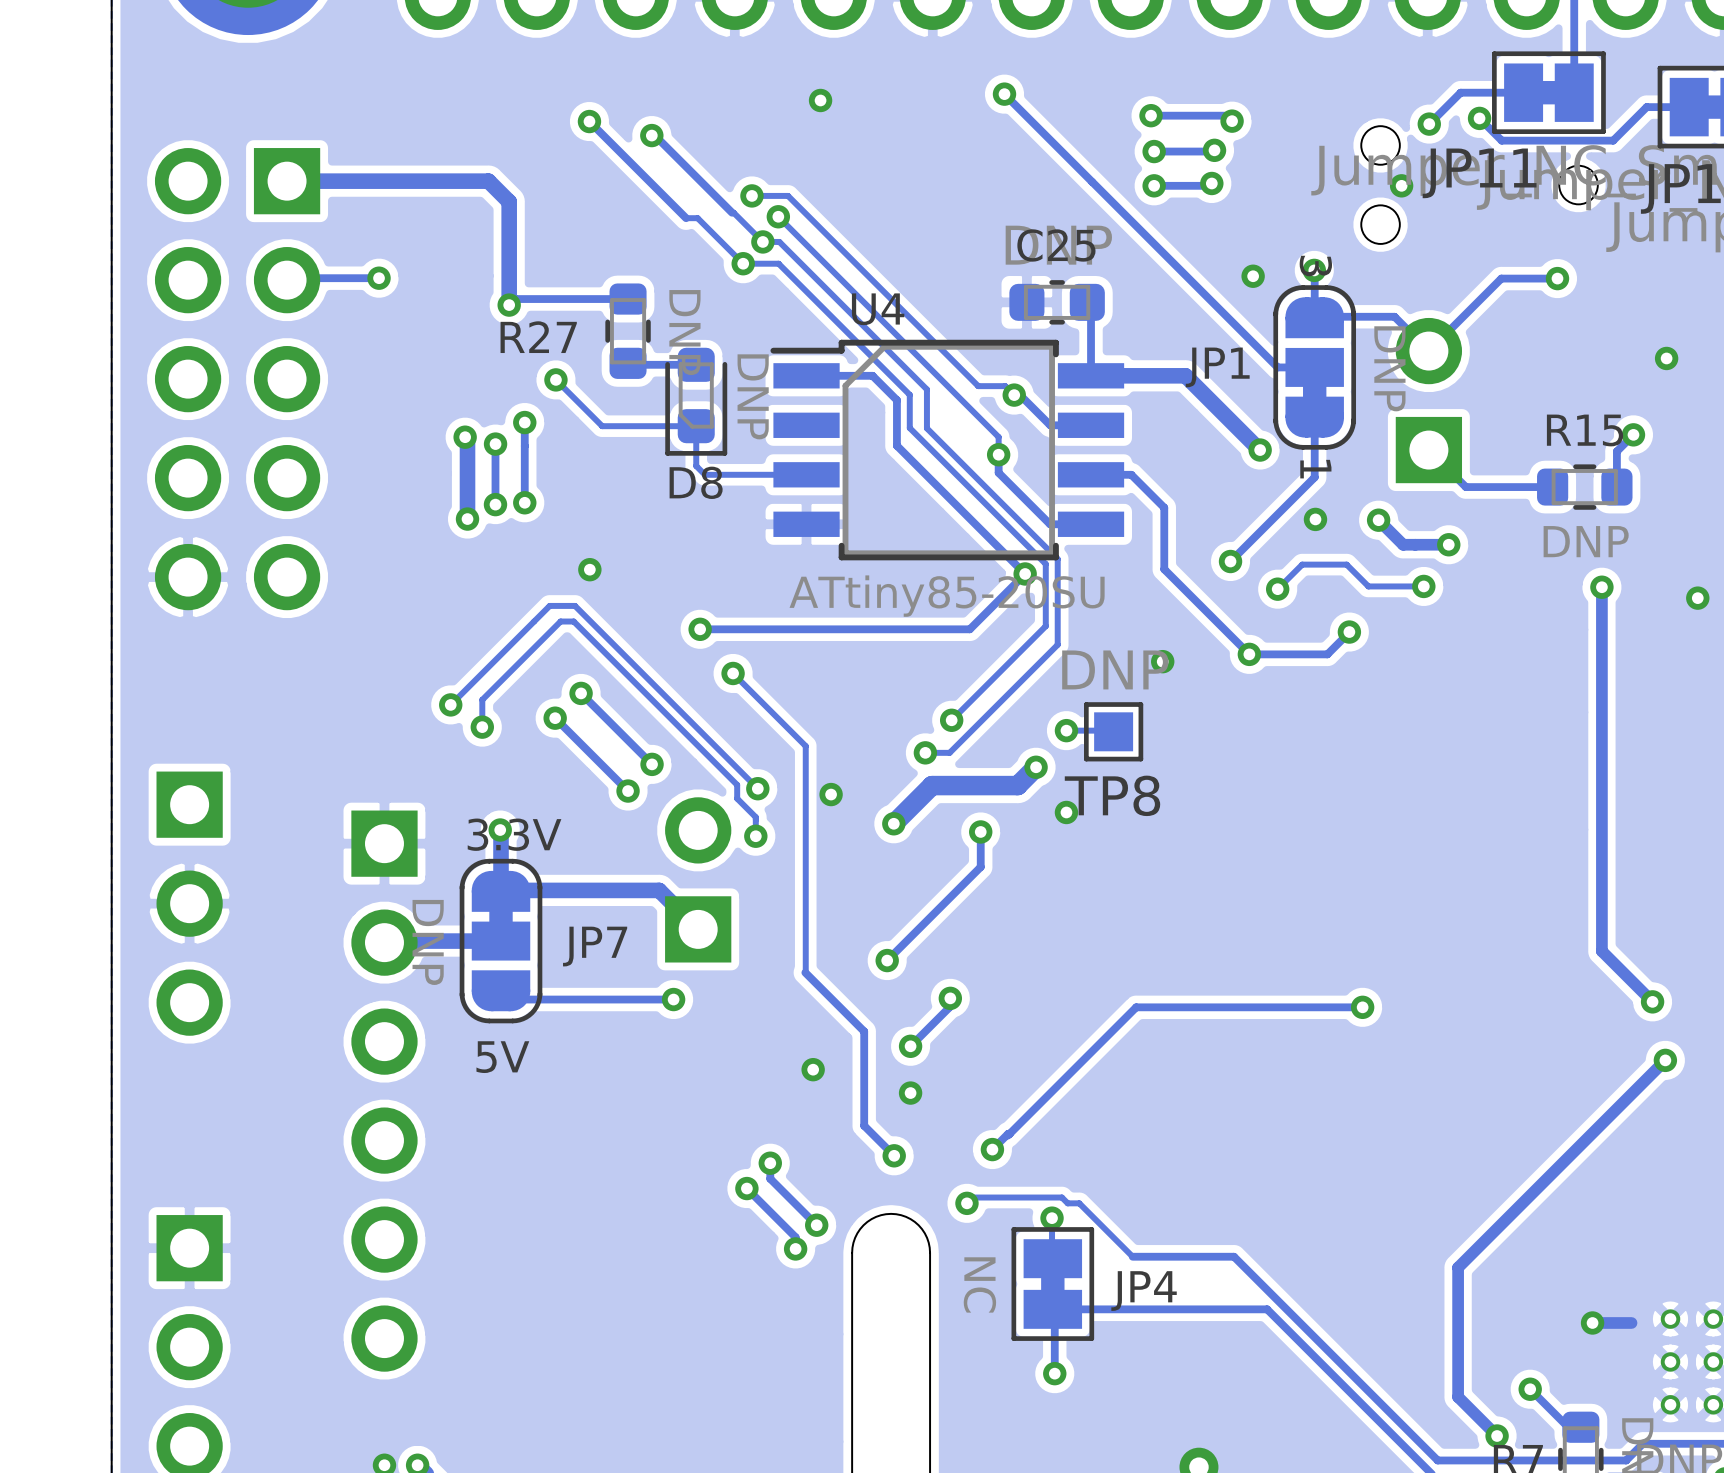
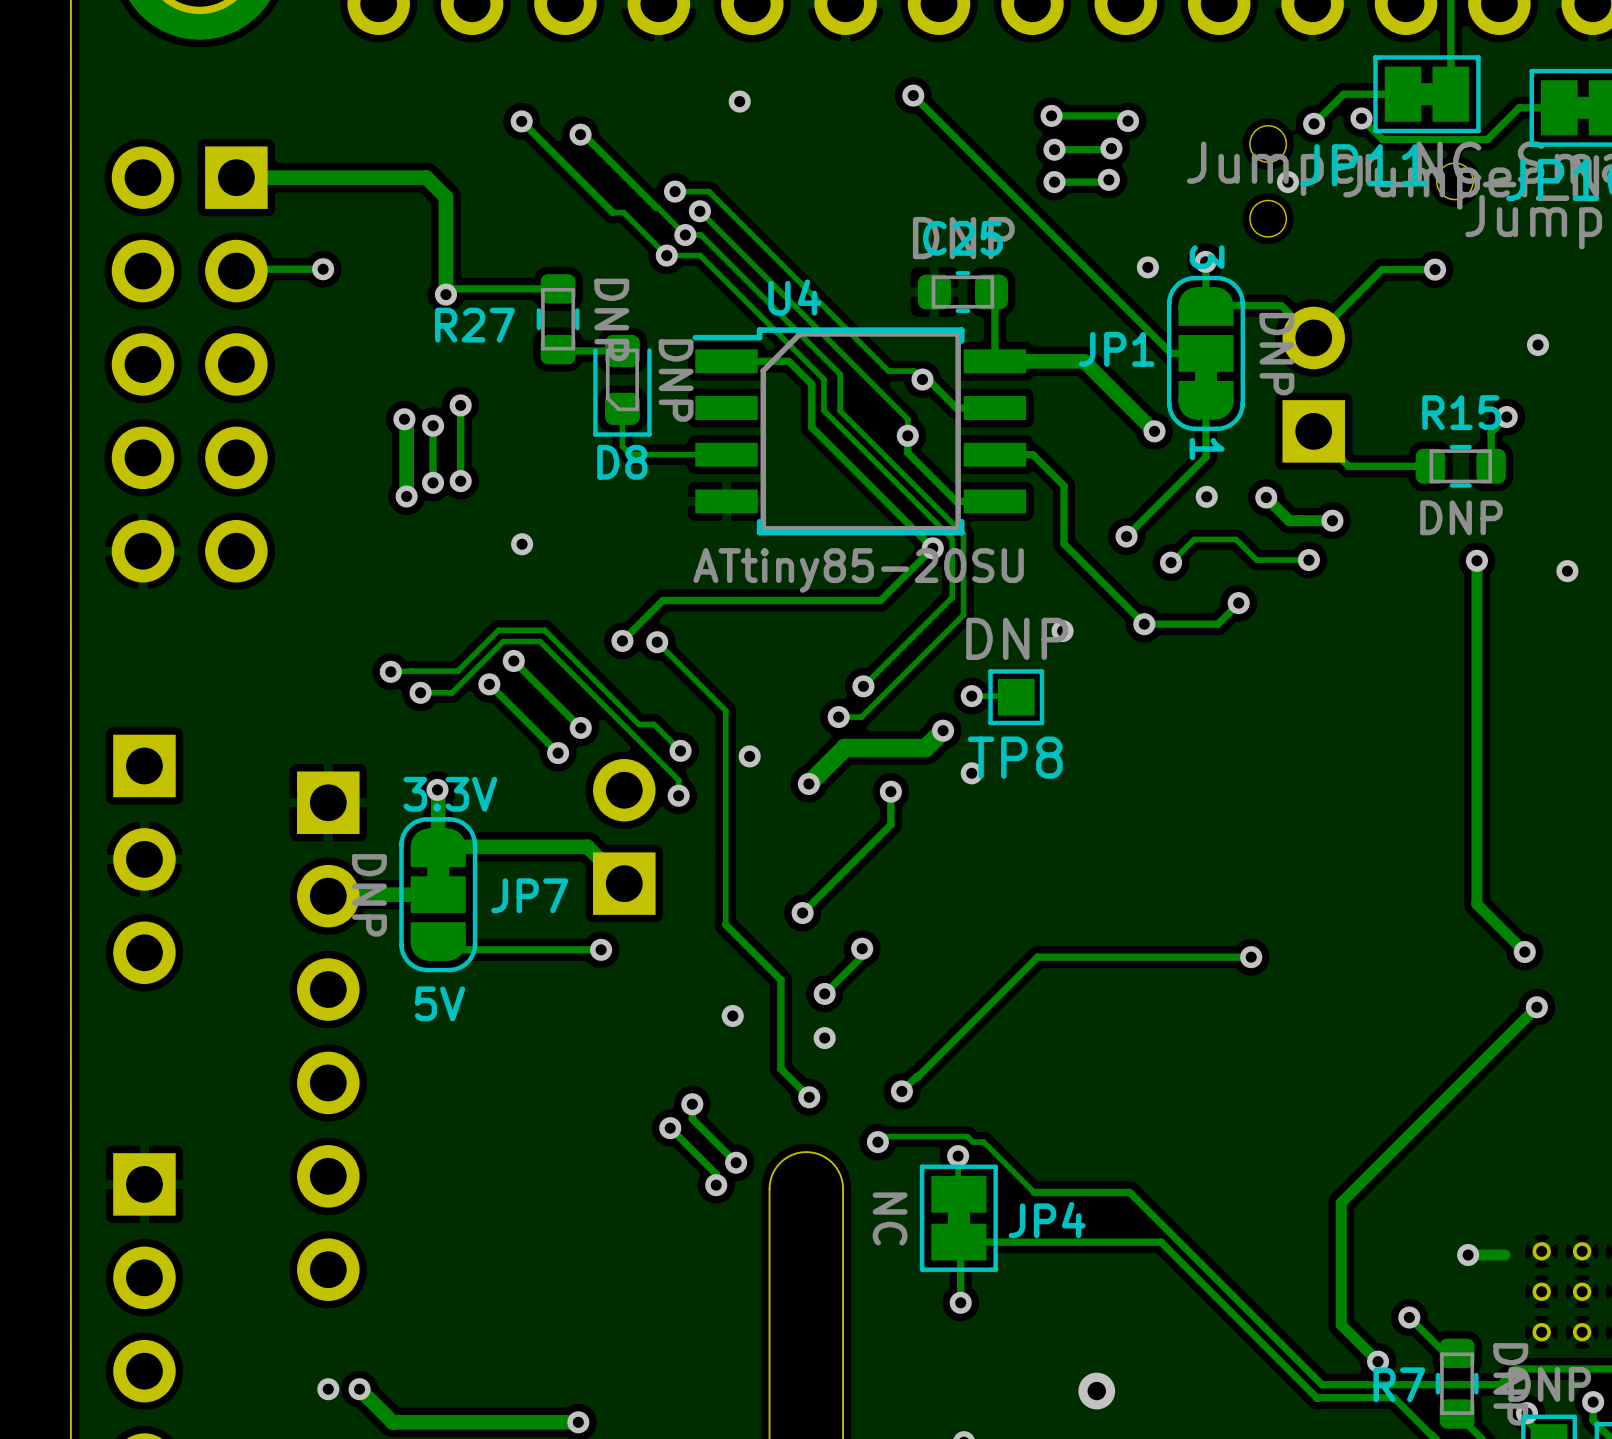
track: (555, 379) (602, 426) (696, 426) -> none
via: (555, 379) -> none
via position: (700, 629) -> (622, 640)
track: (739, 629) (700, 629) -> (662, 600) (622, 640)
track: (450, 704) (549, 605) (575, 605) (729, 760) -> (390, 671) (457, 671) (498, 630) (544, 630) (638, 724) (654, 724)
track: (482, 727) (482, 699) (560, 621) (573, 621) (737, 784) (737, 798) (755, 817) (755, 819) -> (420, 692) (452, 692) (503, 641) (540, 641) (678, 780)

